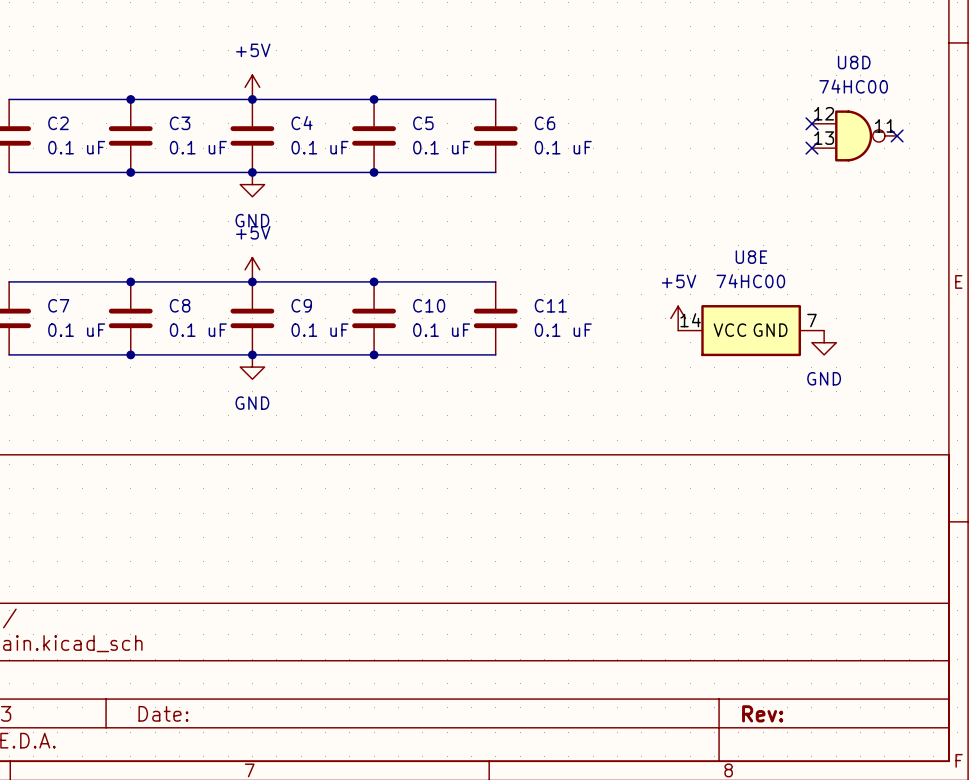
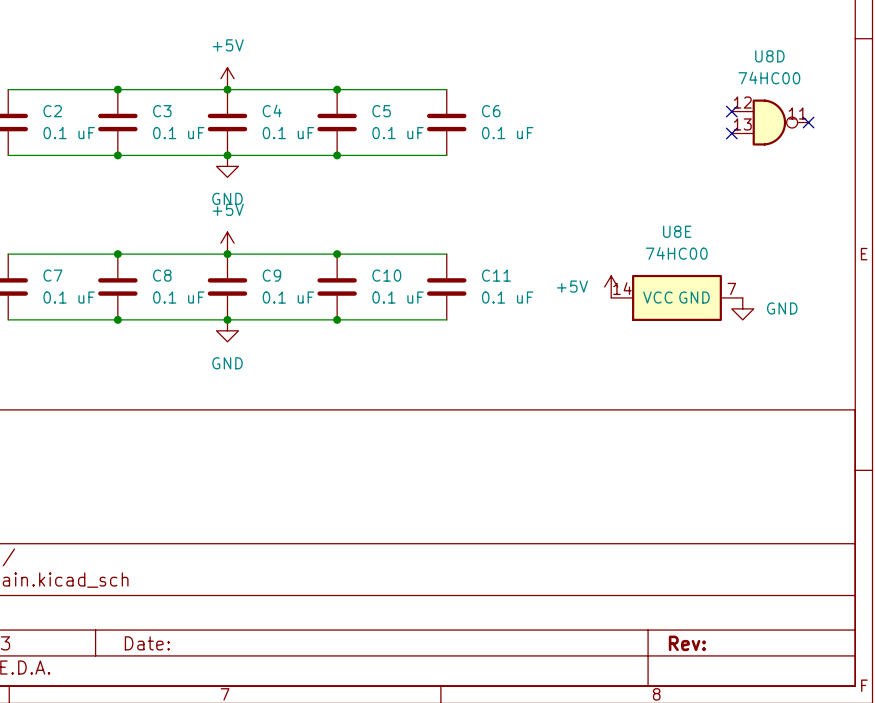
power symbol text position: +5V (679, 281) -> +5V (572, 286)
power symbol text position: GND (824, 378) -> GND (782, 308)

